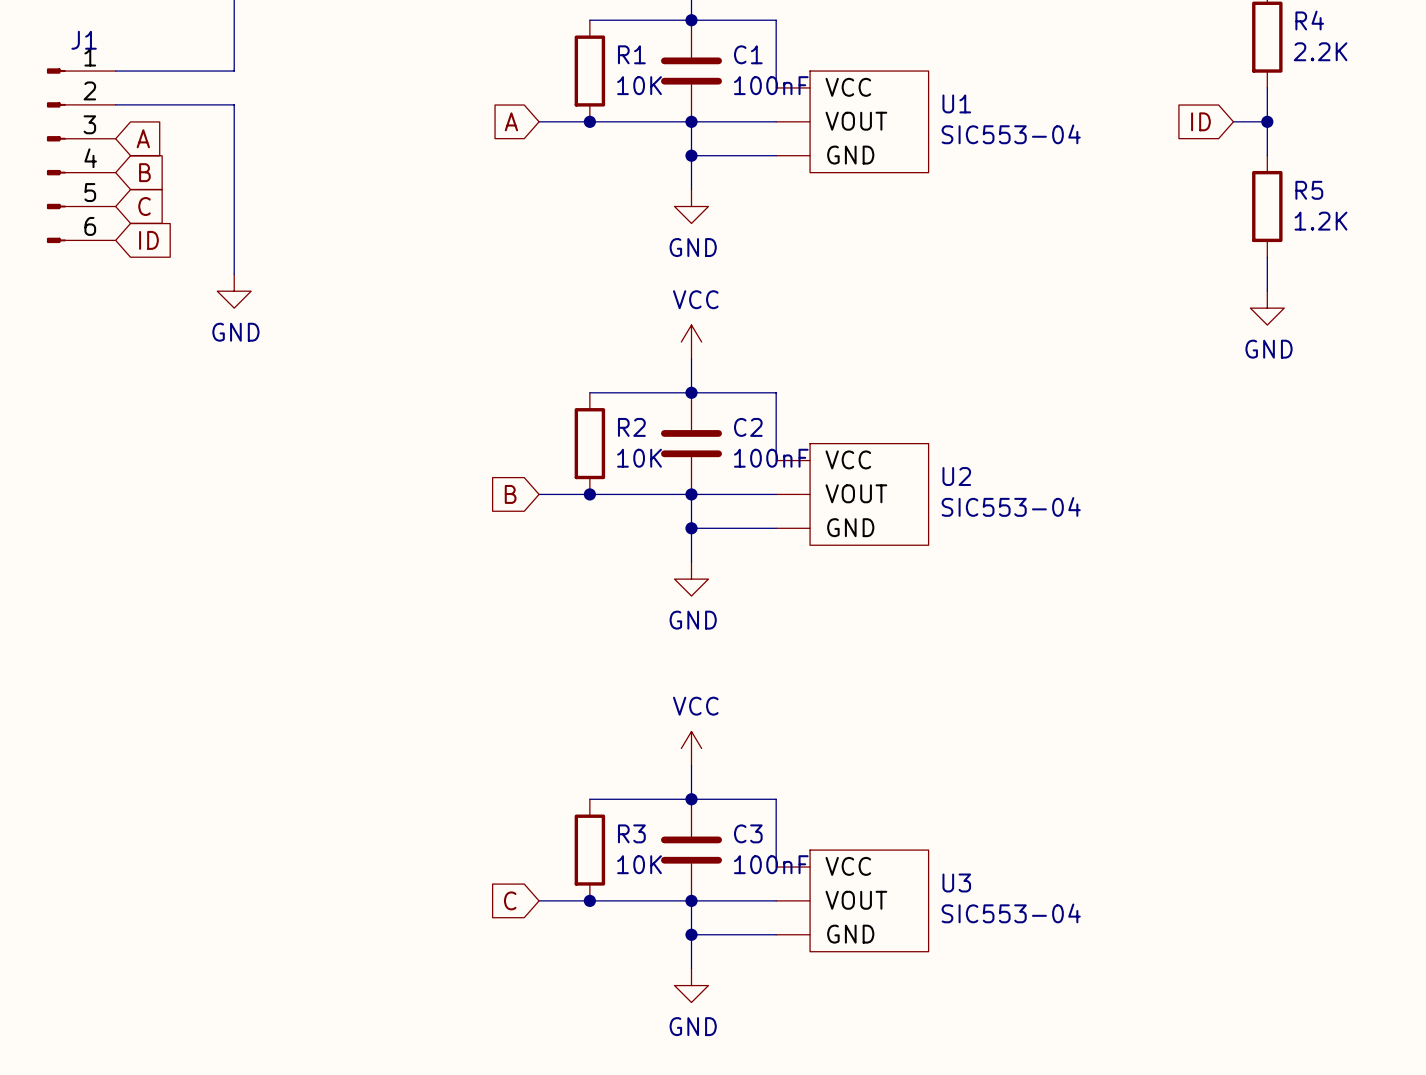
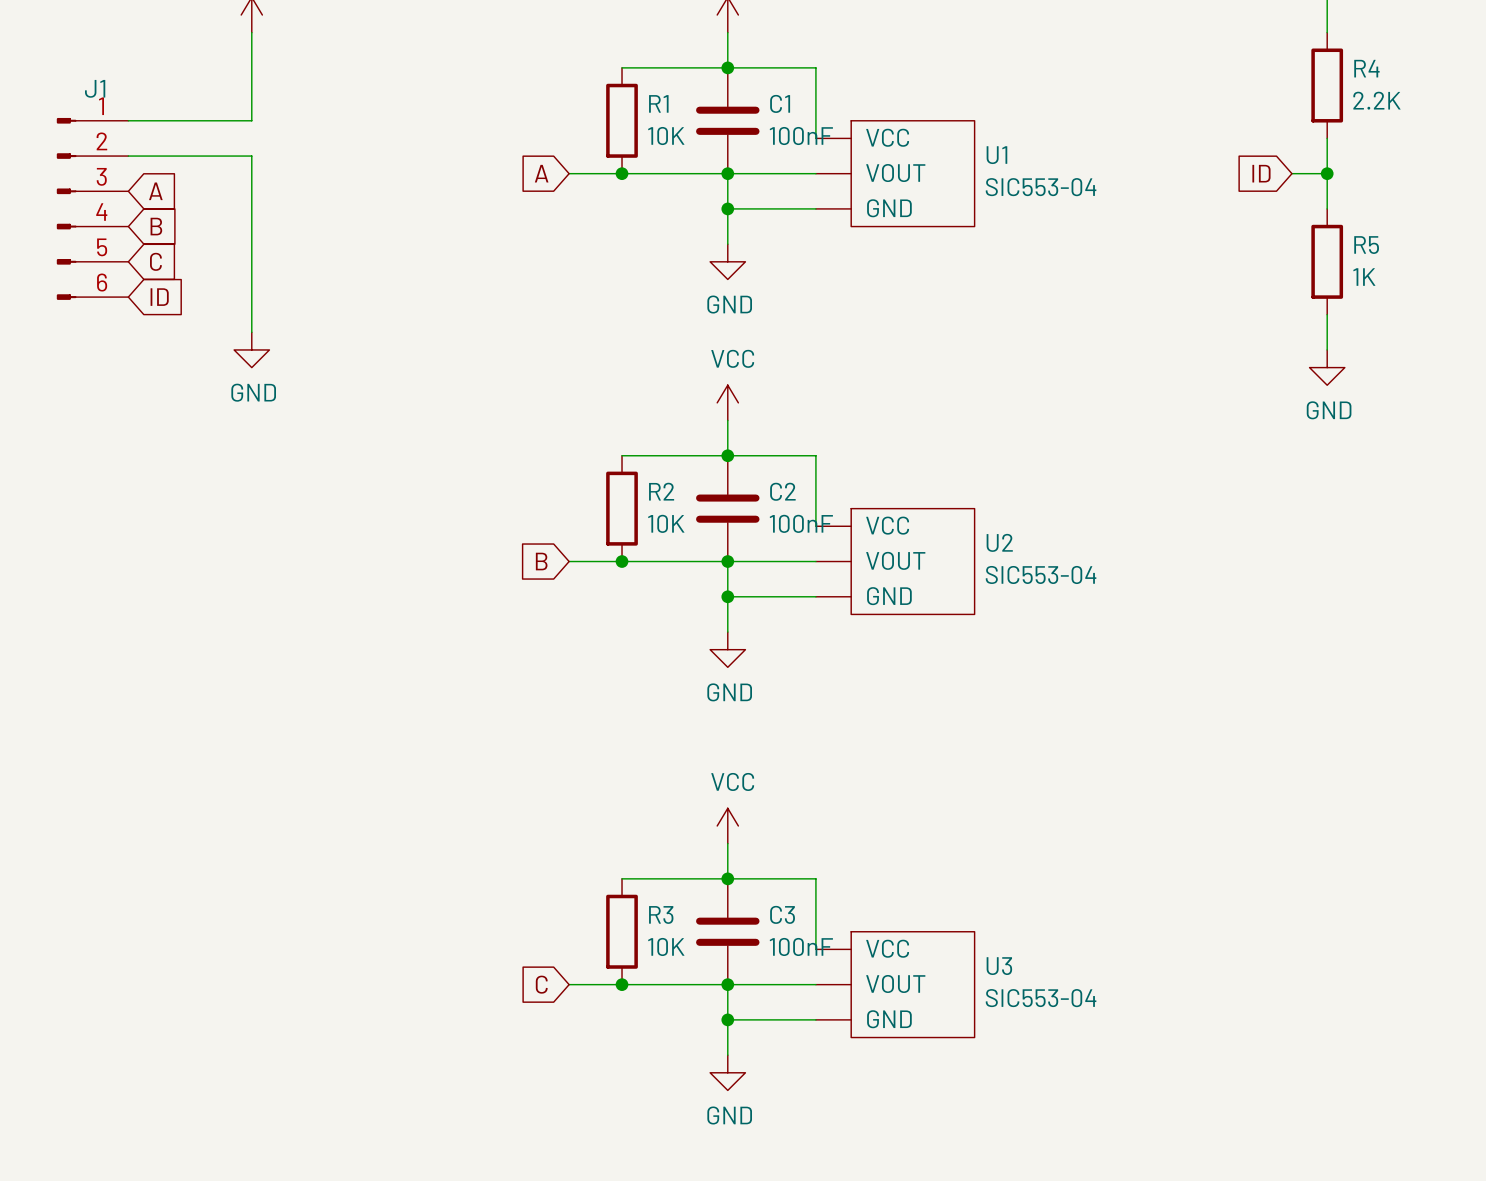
R5 value: 1.2K (1321, 221) -> 1K (1364, 277)

